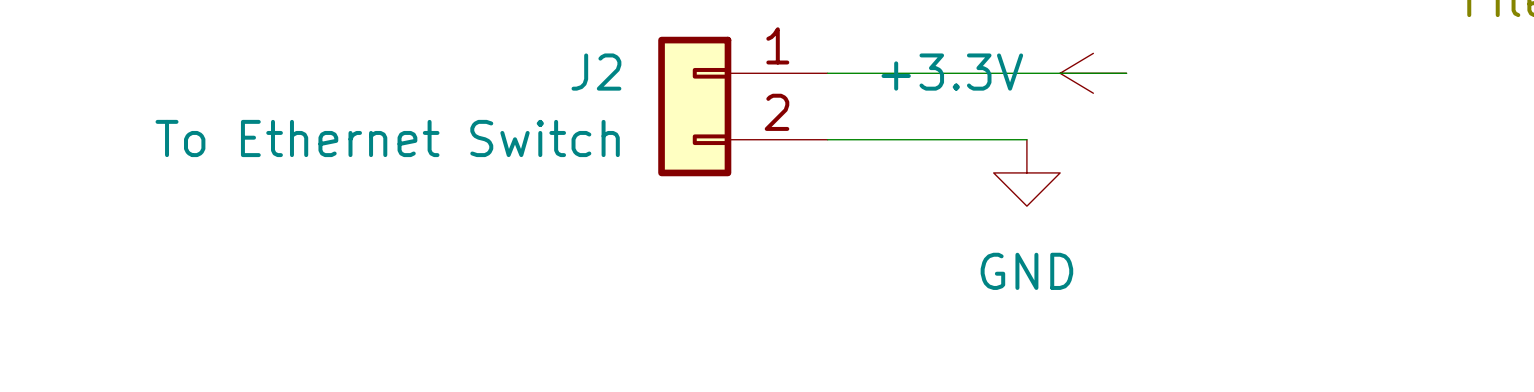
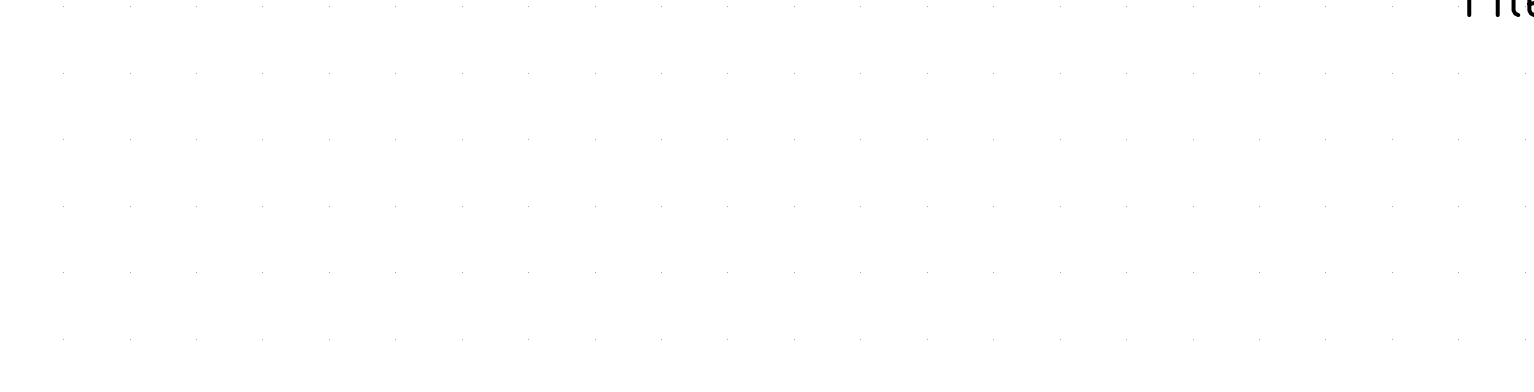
wire: (827, 73) (1126, 73) -> none
power symbol: +3.3V (1093, 73) -> none
J2: To Ethernet Switch (742, 106) -> none
wire: (827, 139) (1026, 139) -> none
power symbol: GND (1026, 172) -> none

